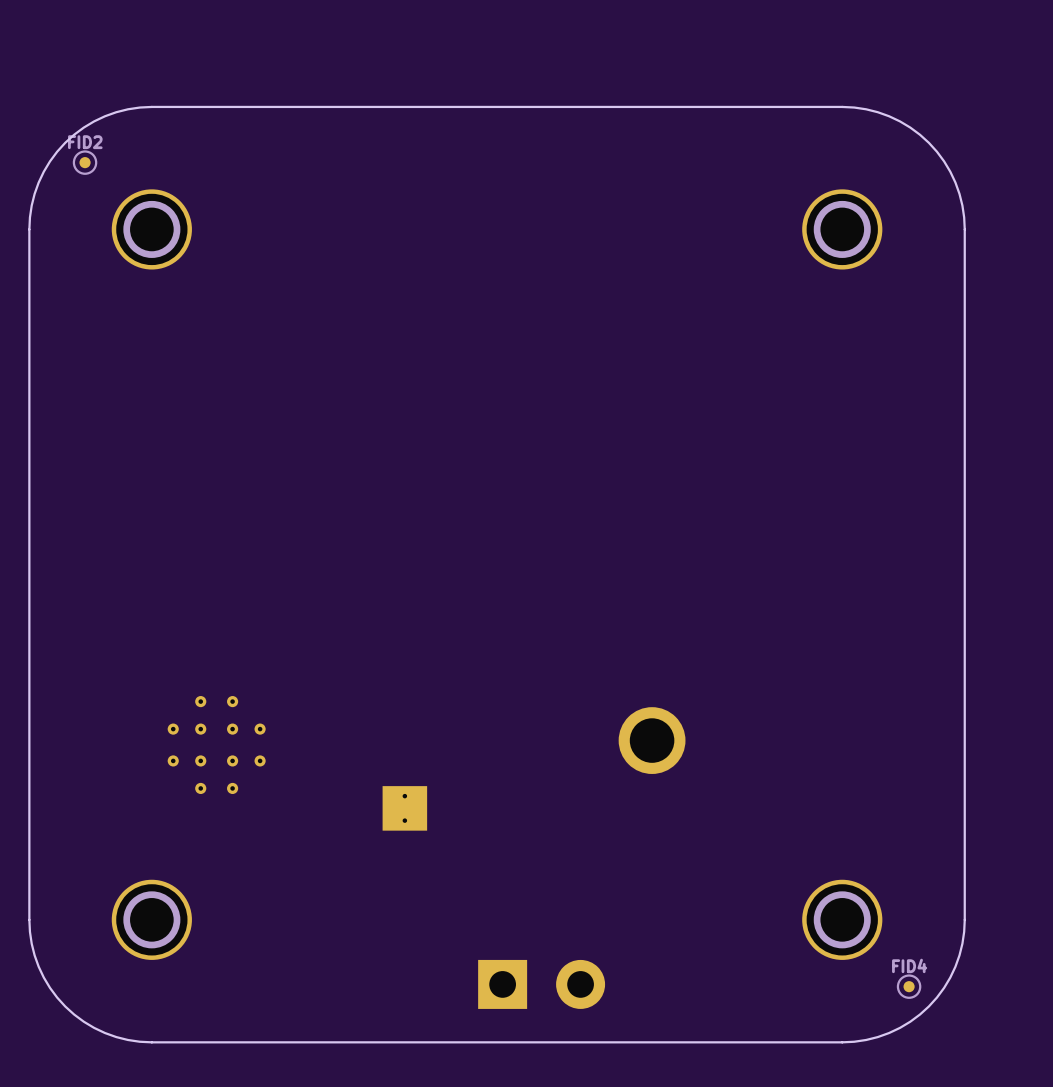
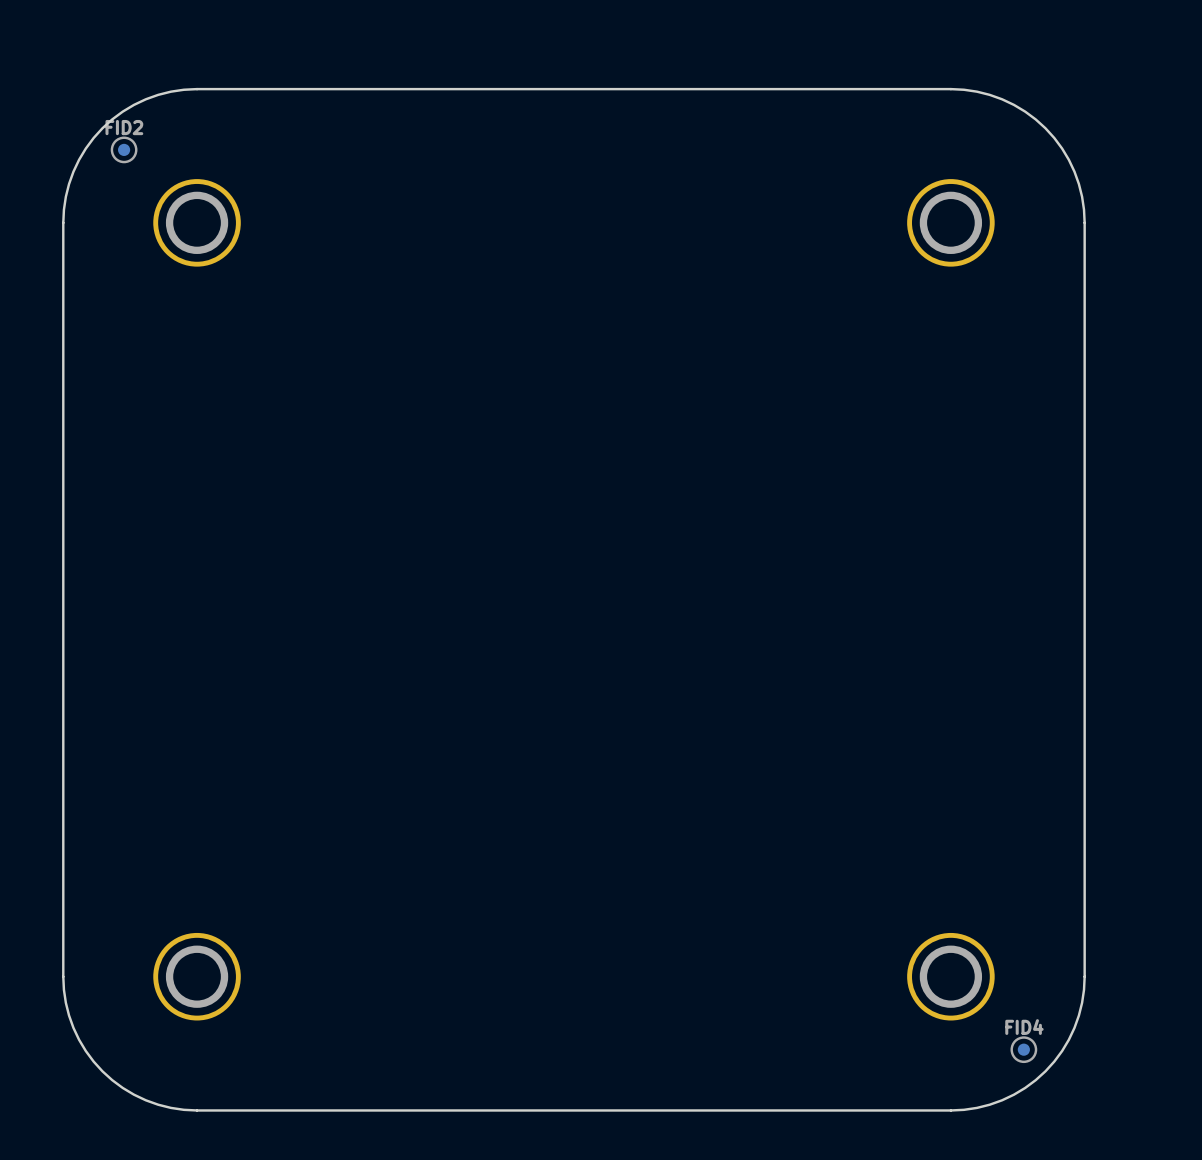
part: (652, 740) -> none
part: (216, 745) -> none
part: (404, 808) -> none
part: (541, 984) -> none

